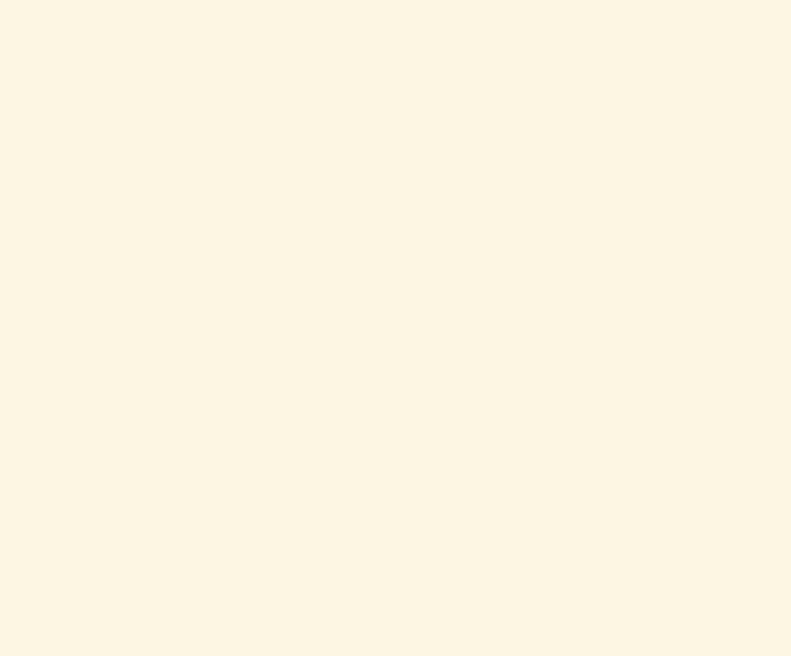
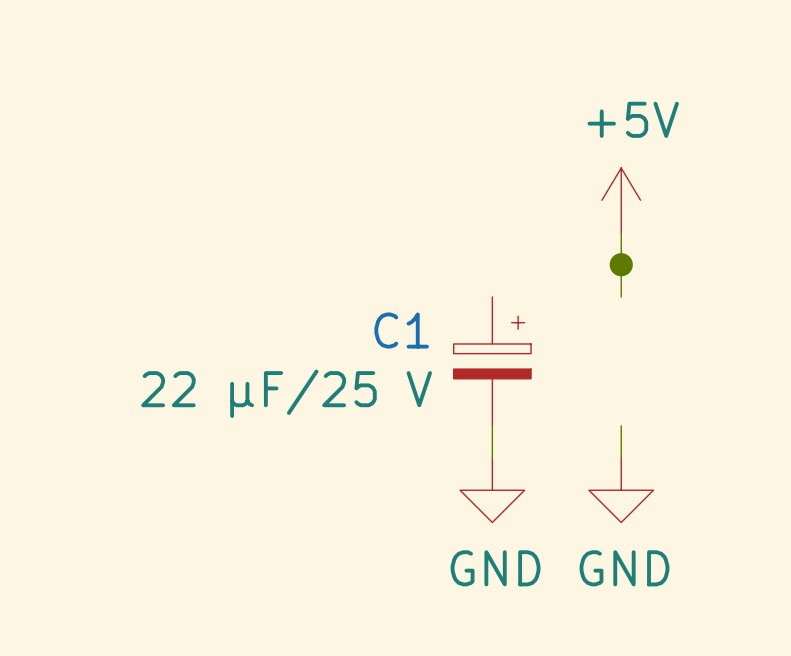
power symbol: none -> +5V (621, 200)
wire: none -> (621, 232) (621, 296)
junction: none -> (621, 264)
C1: none -> 22 µF/25 V (492, 361)
wire: none -> (492, 425) (492, 458)
wire: none -> (621, 425) (621, 458)
power symbol: none -> GND (492, 490)
power symbol: none -> GND (621, 490)

